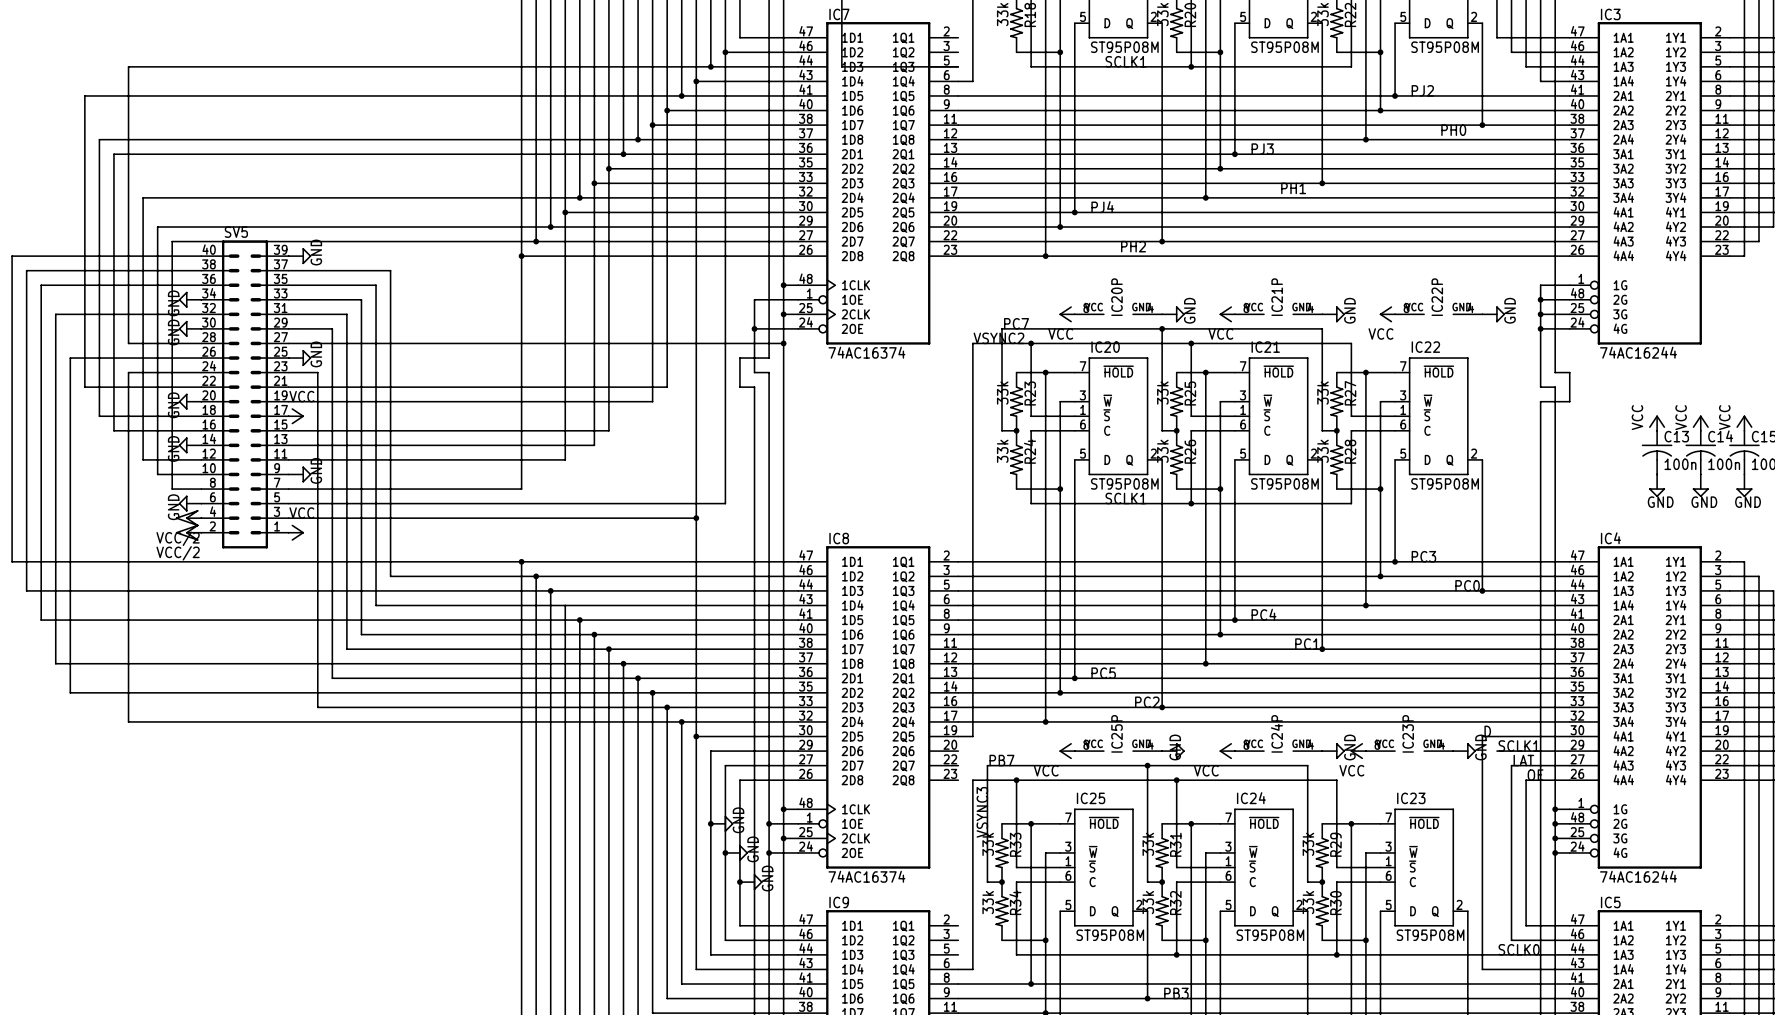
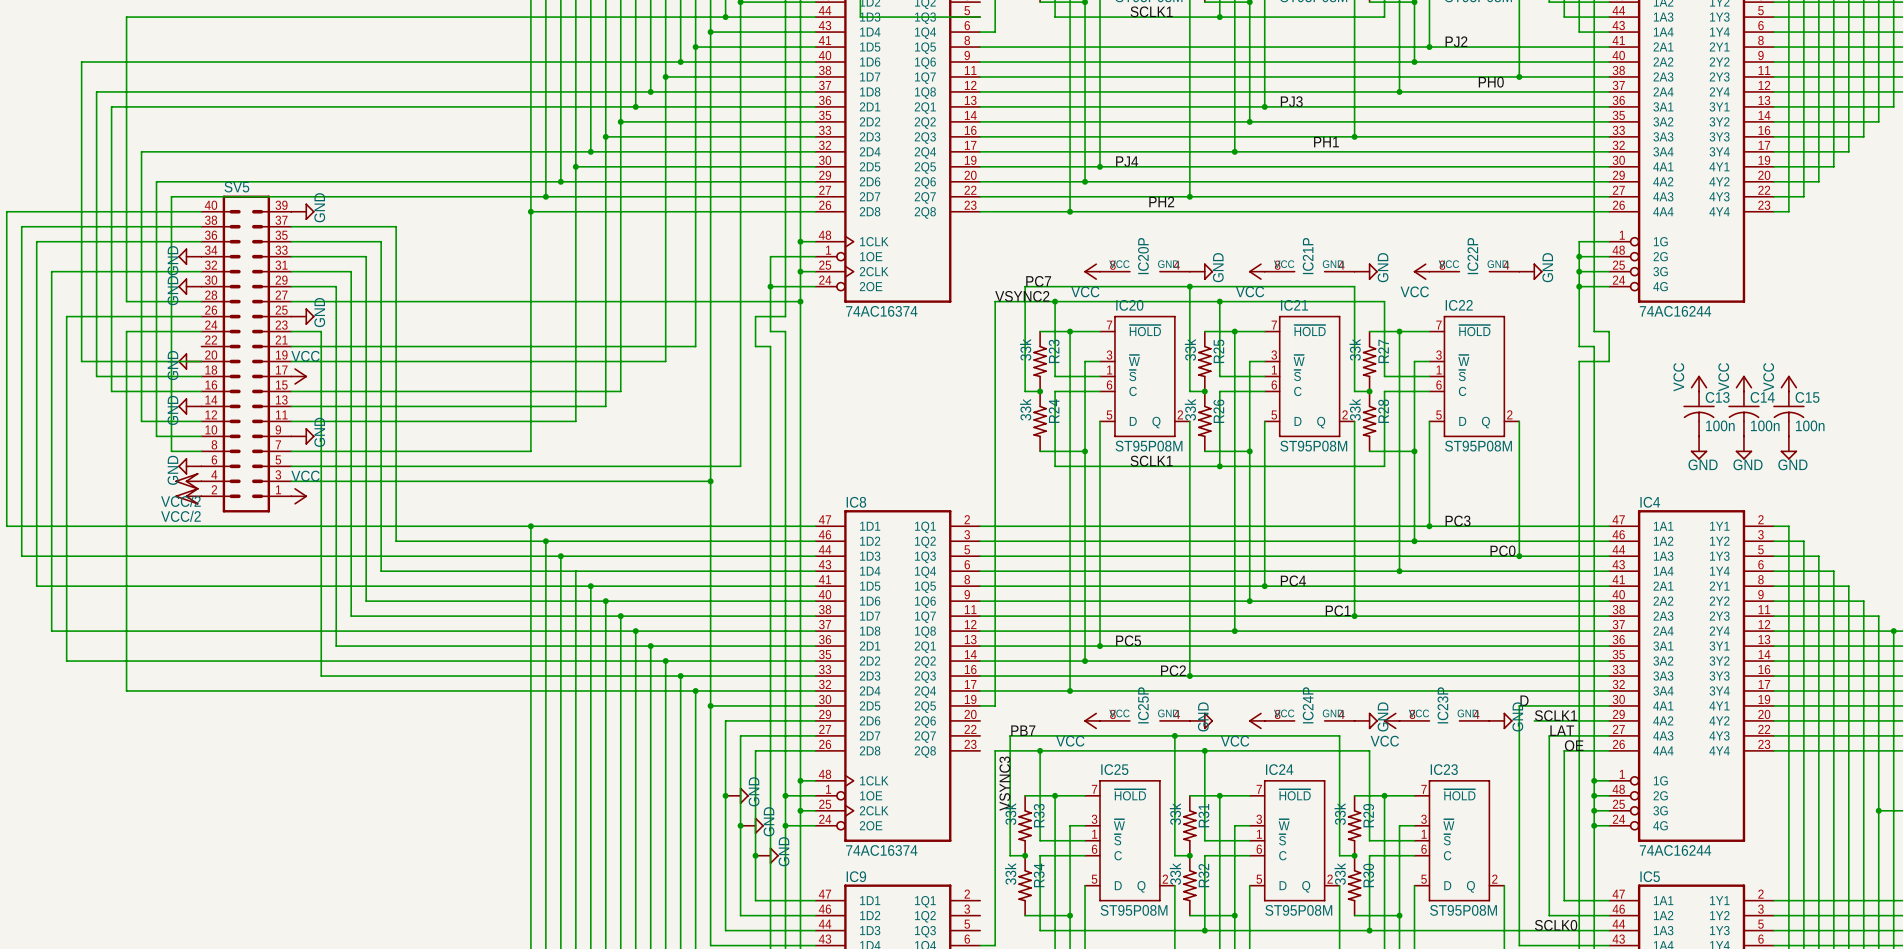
wire: (681, 95) (84, 95) (84, 110) -> (680, 61) (81, 61)
wire: (667, 110) (667, 387) -> (695, 47) (695, 346) (680, 346)
wire: (84, 387) (201, 387) -> (81, 346) (81, 361) (201, 361)

